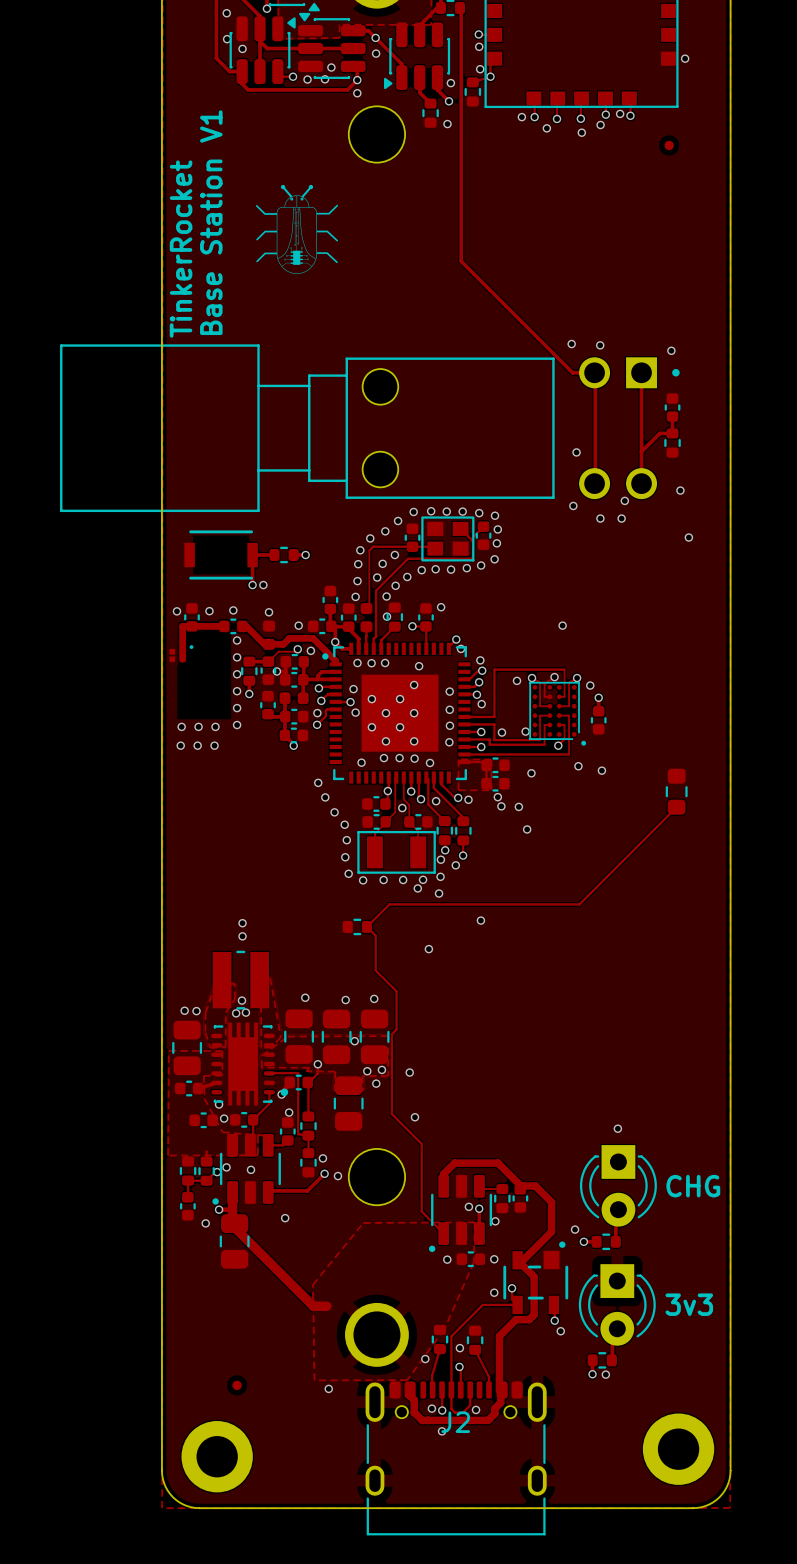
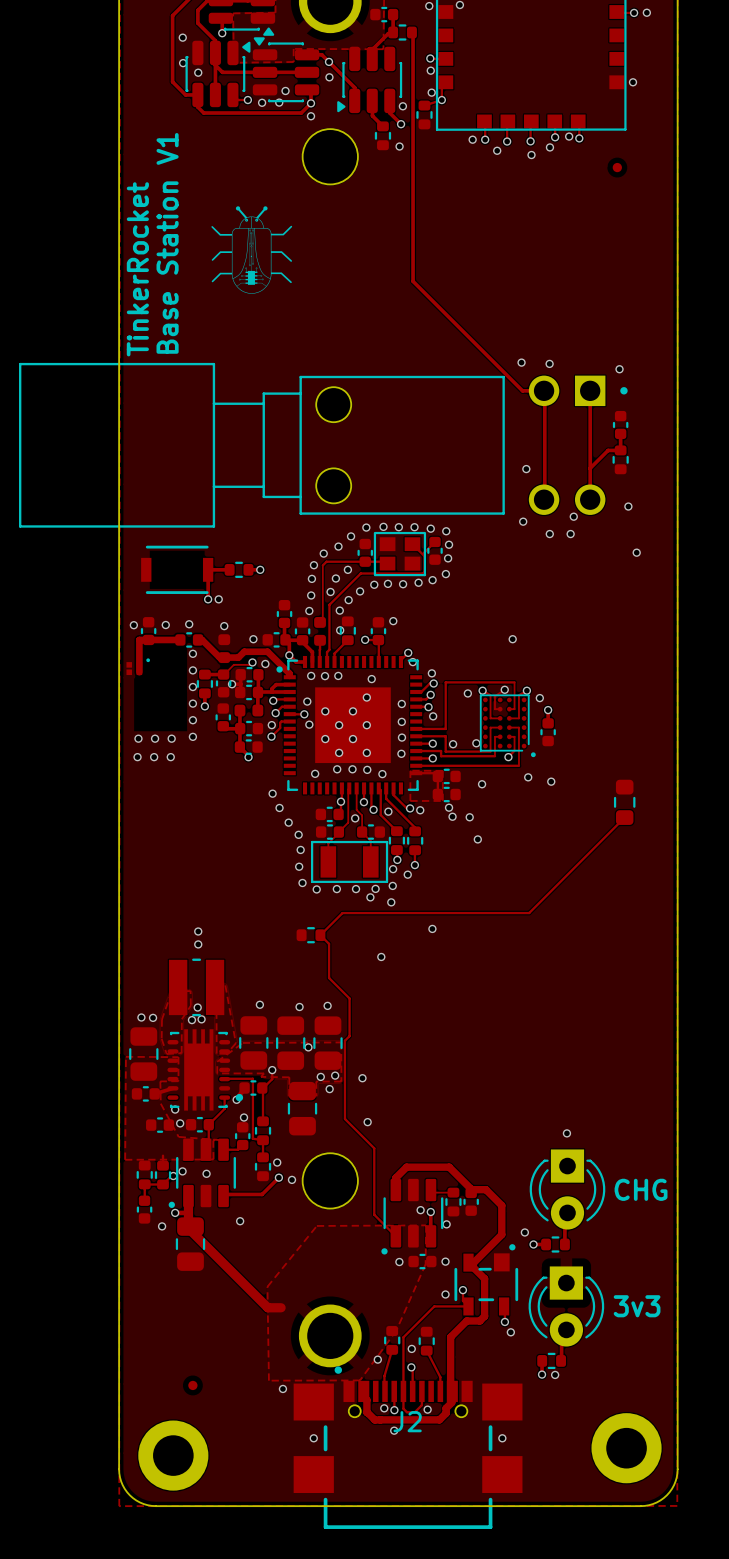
J2 footprint: [365, 1381, 547, 1536] -> [293, 1366, 523, 1529]
via: none -> (313, 1438)
via: none -> (502, 1438)

